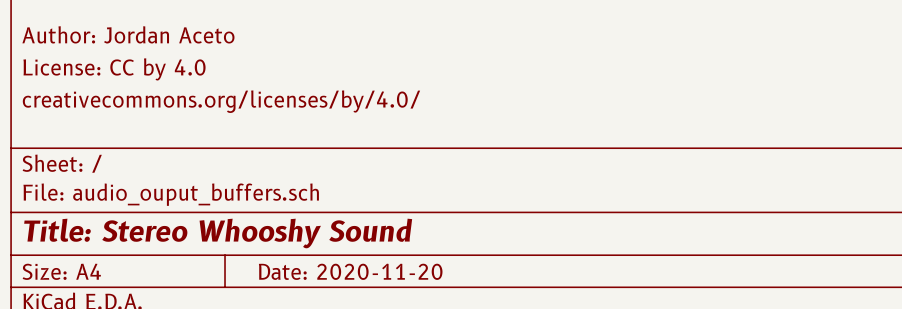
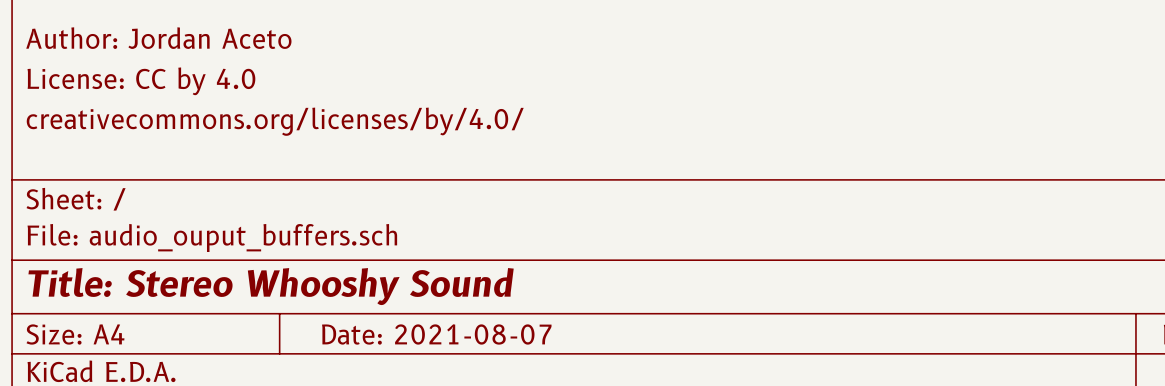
title block: Date: 2020-11-20 (350, 271) -> Date: 2021-08-07 (436, 334)

